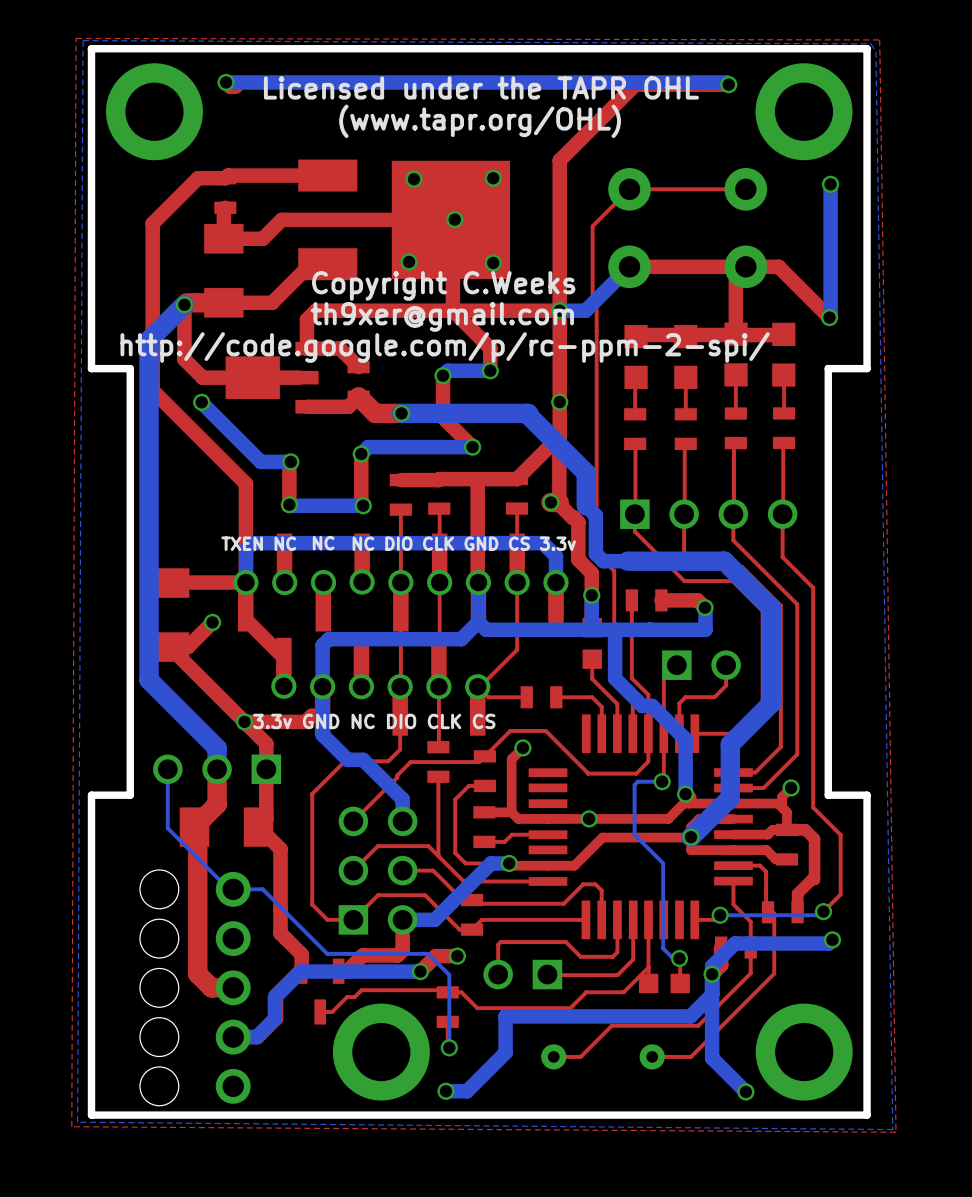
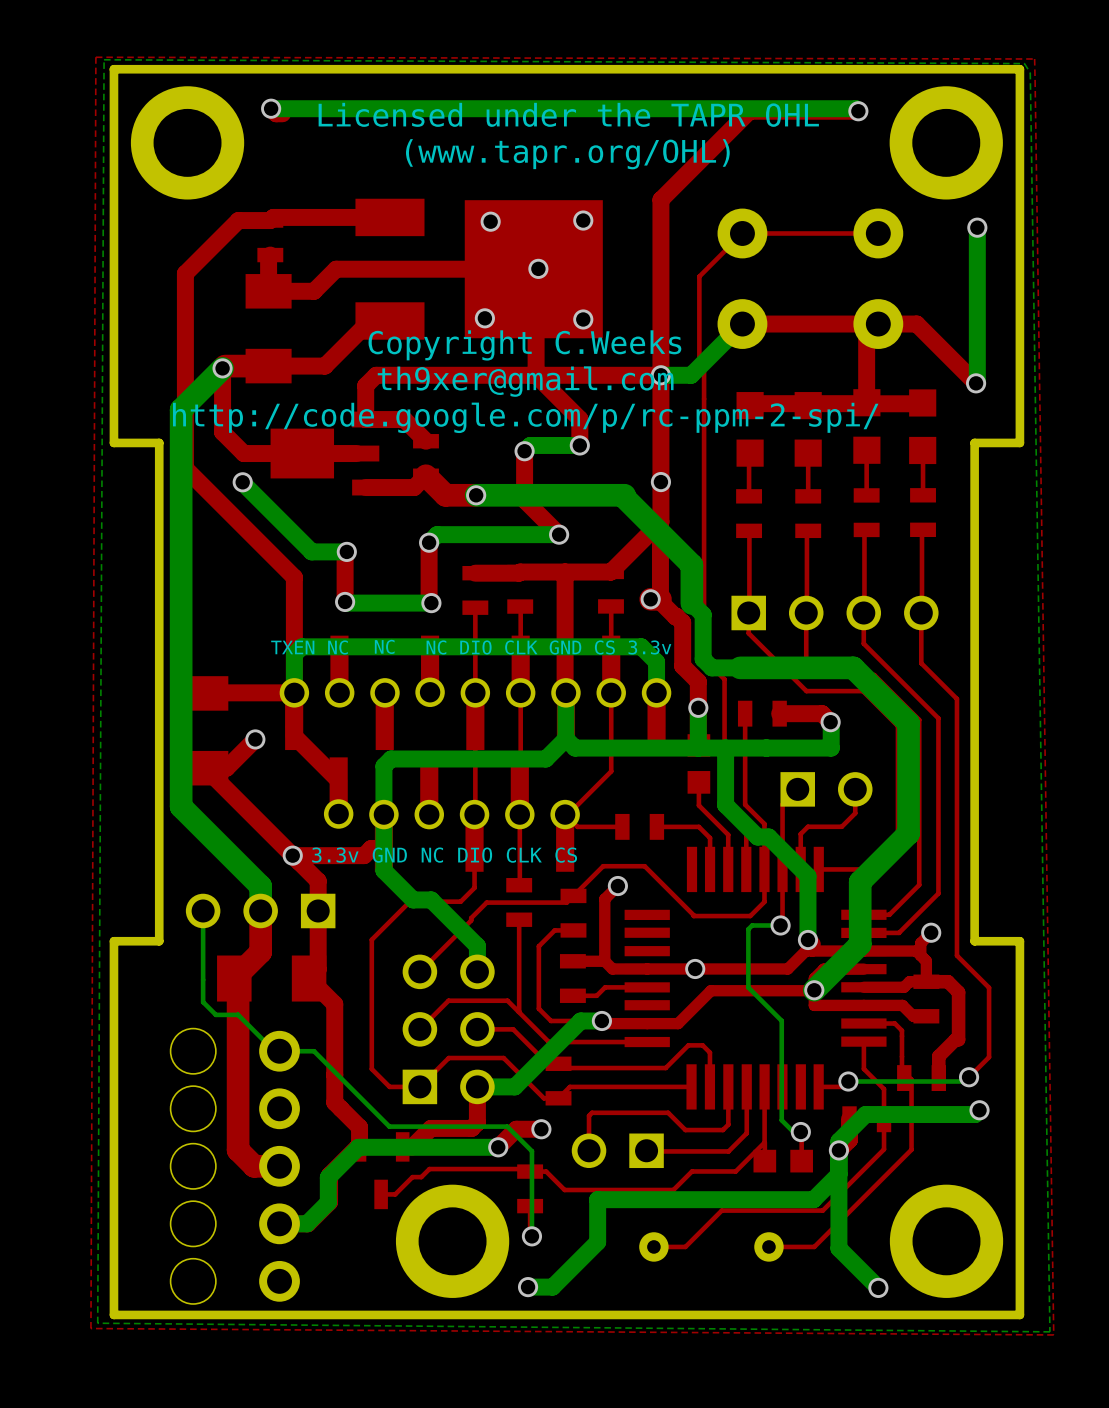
bottom track: (167, 828) (197, 858) -> (203, 979) (203, 1002) (215, 1014) (238, 1014)

